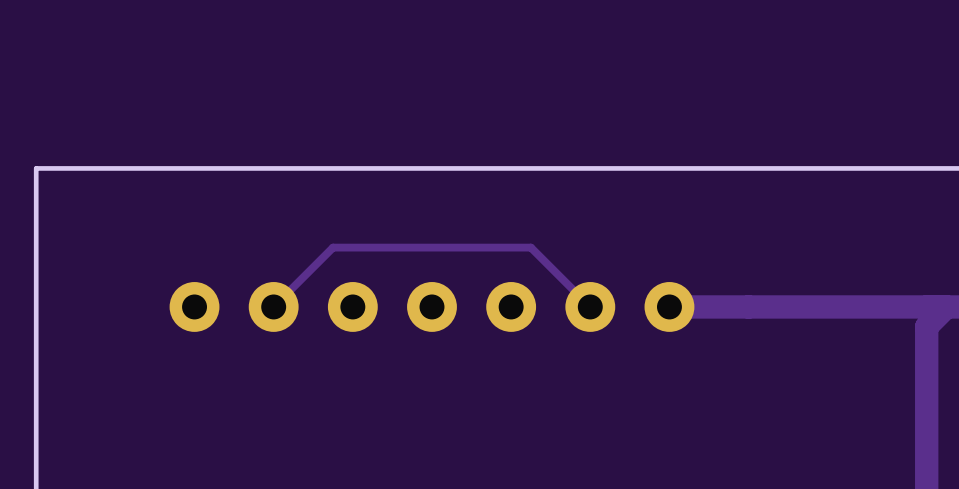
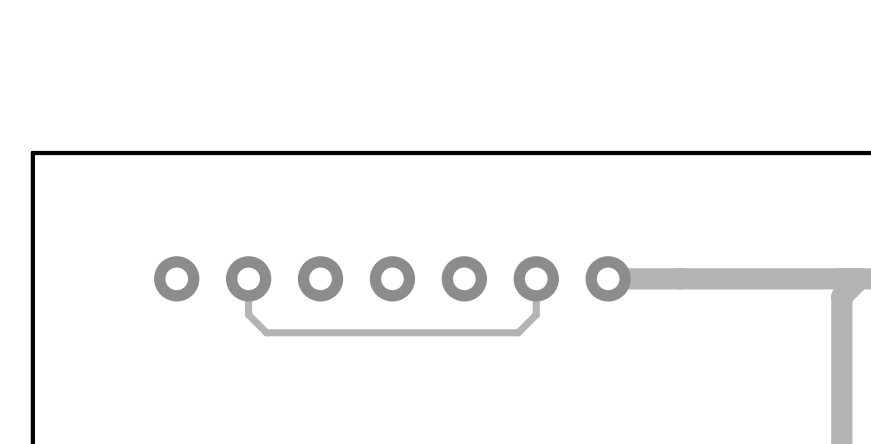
track: (590, 306) (530, 247) (333, 247) (273, 306) -> (536, 278) (536, 314) (518, 332) (266, 332) (248, 314) (248, 278)

